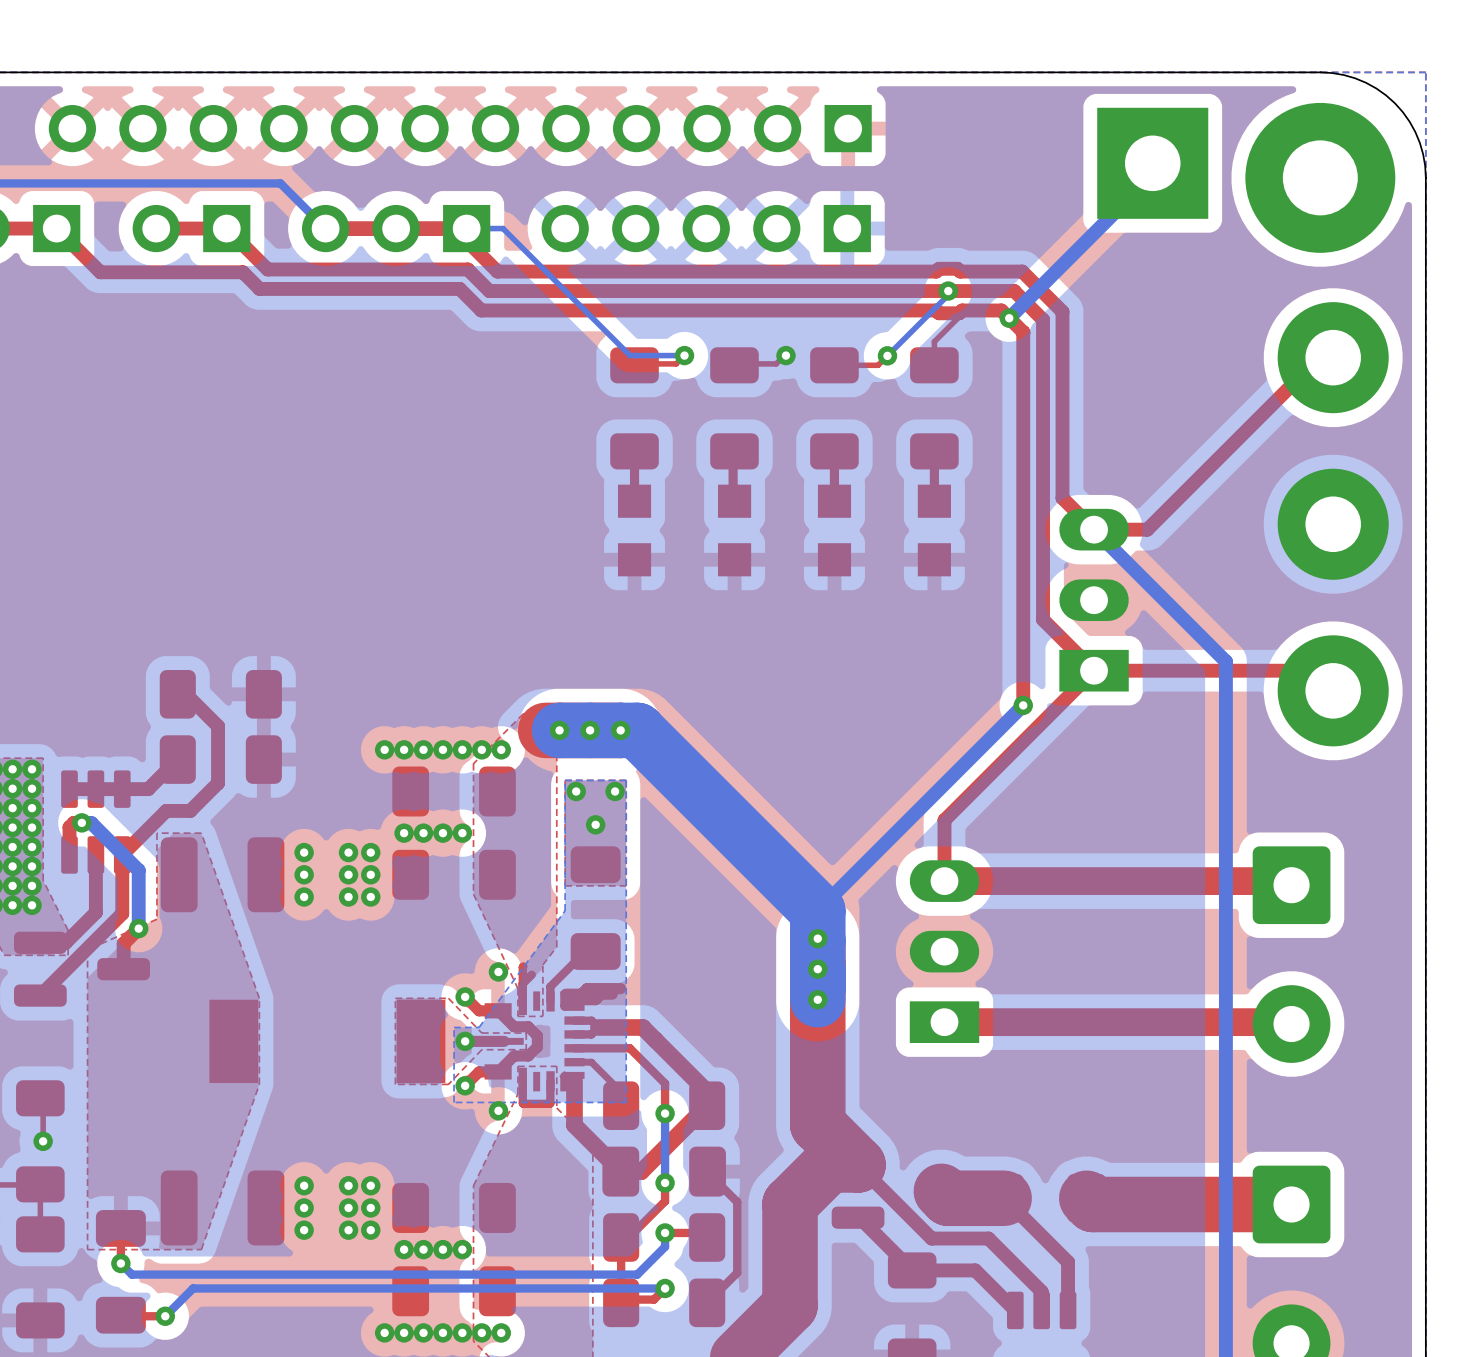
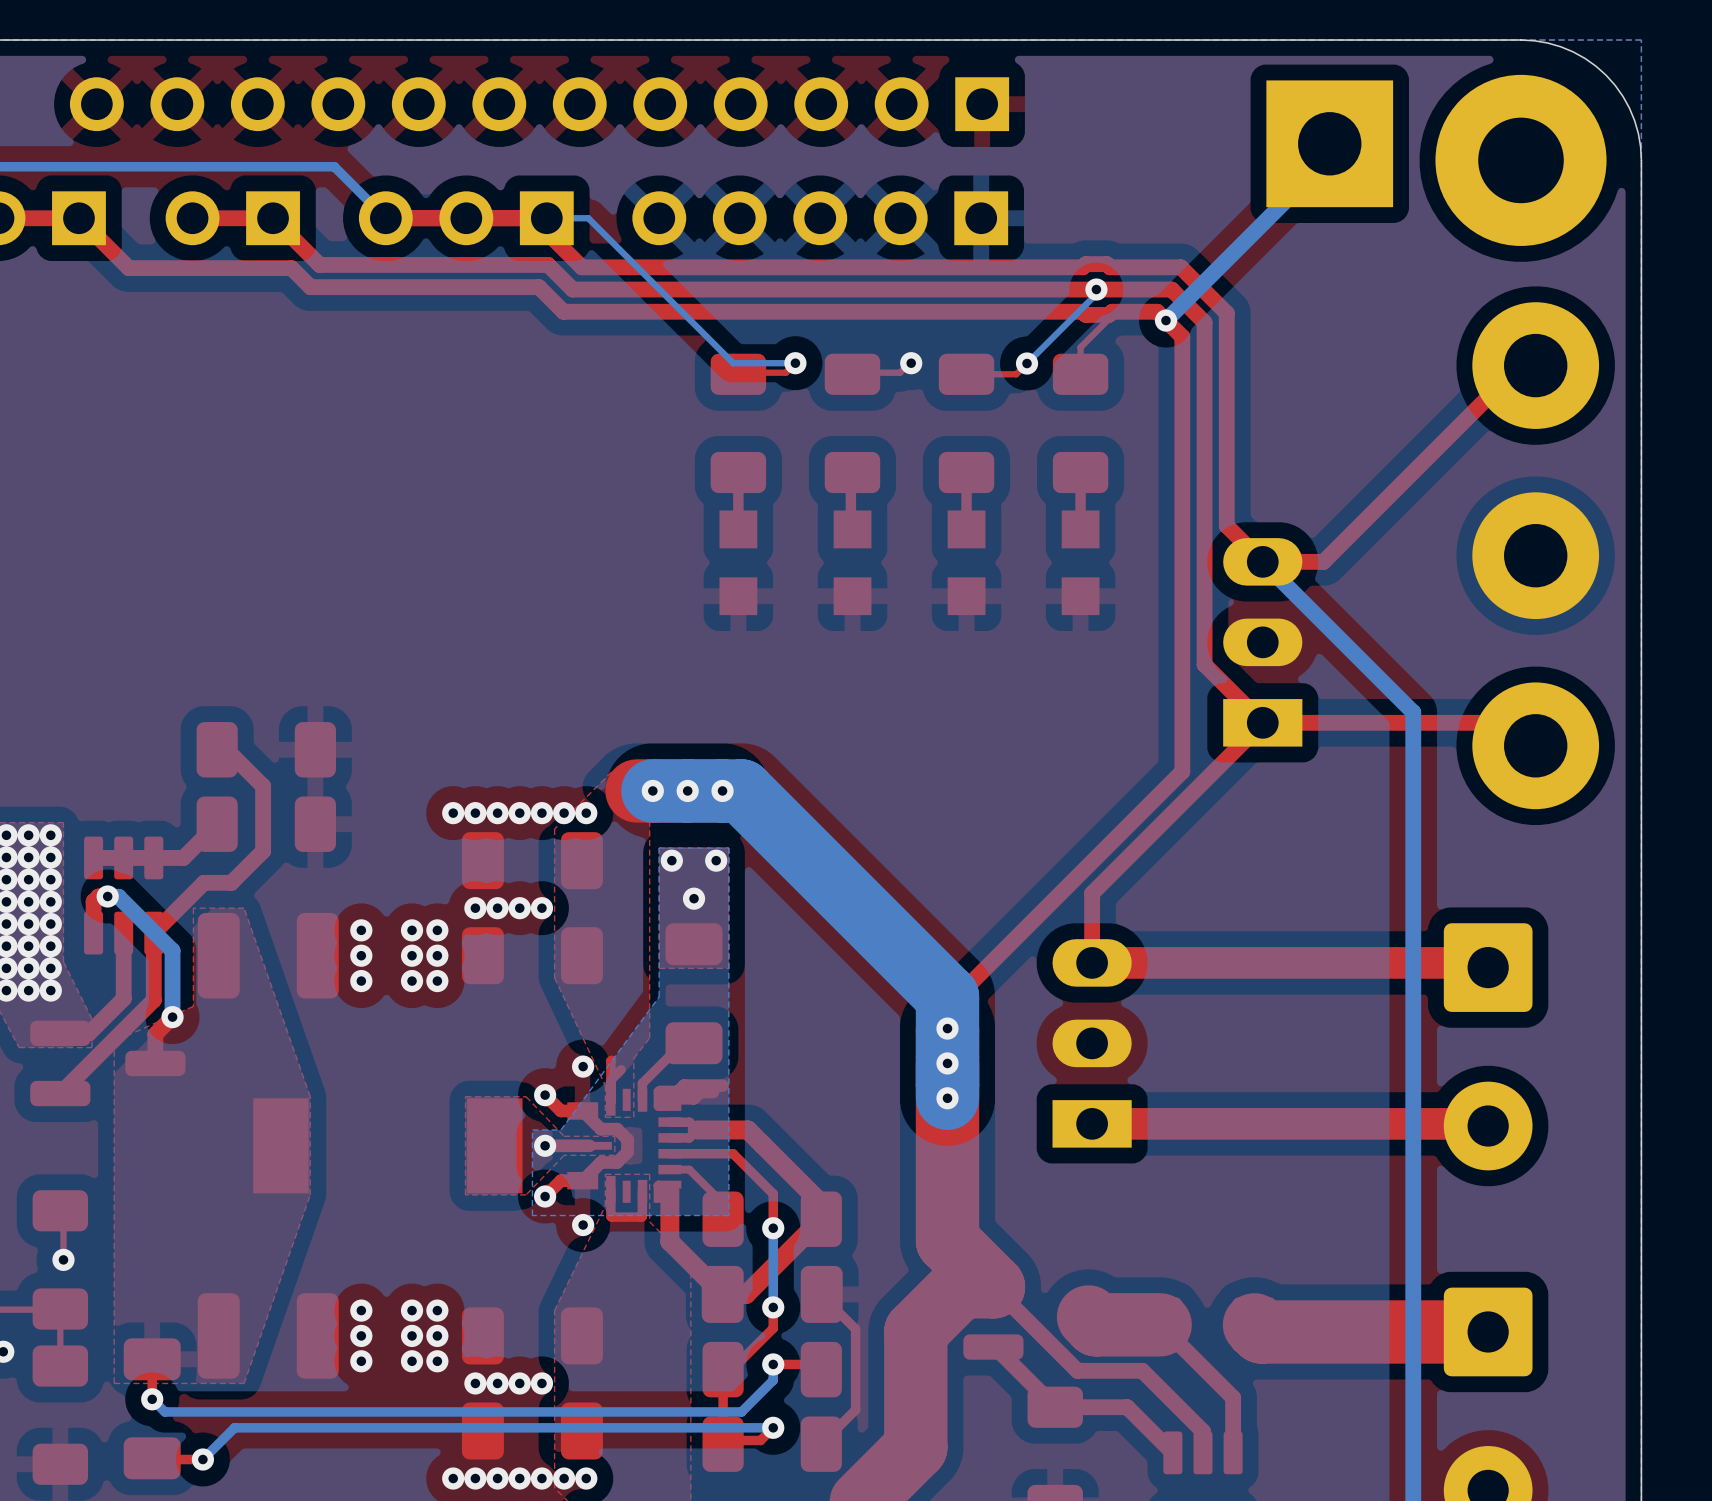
top track: (1023, 332) (1023, 705) -> (1182, 336) (1182, 771) (947, 1006)
bottom track: (1023, 705) (817, 910) -> none
via: (1023, 705) -> none

